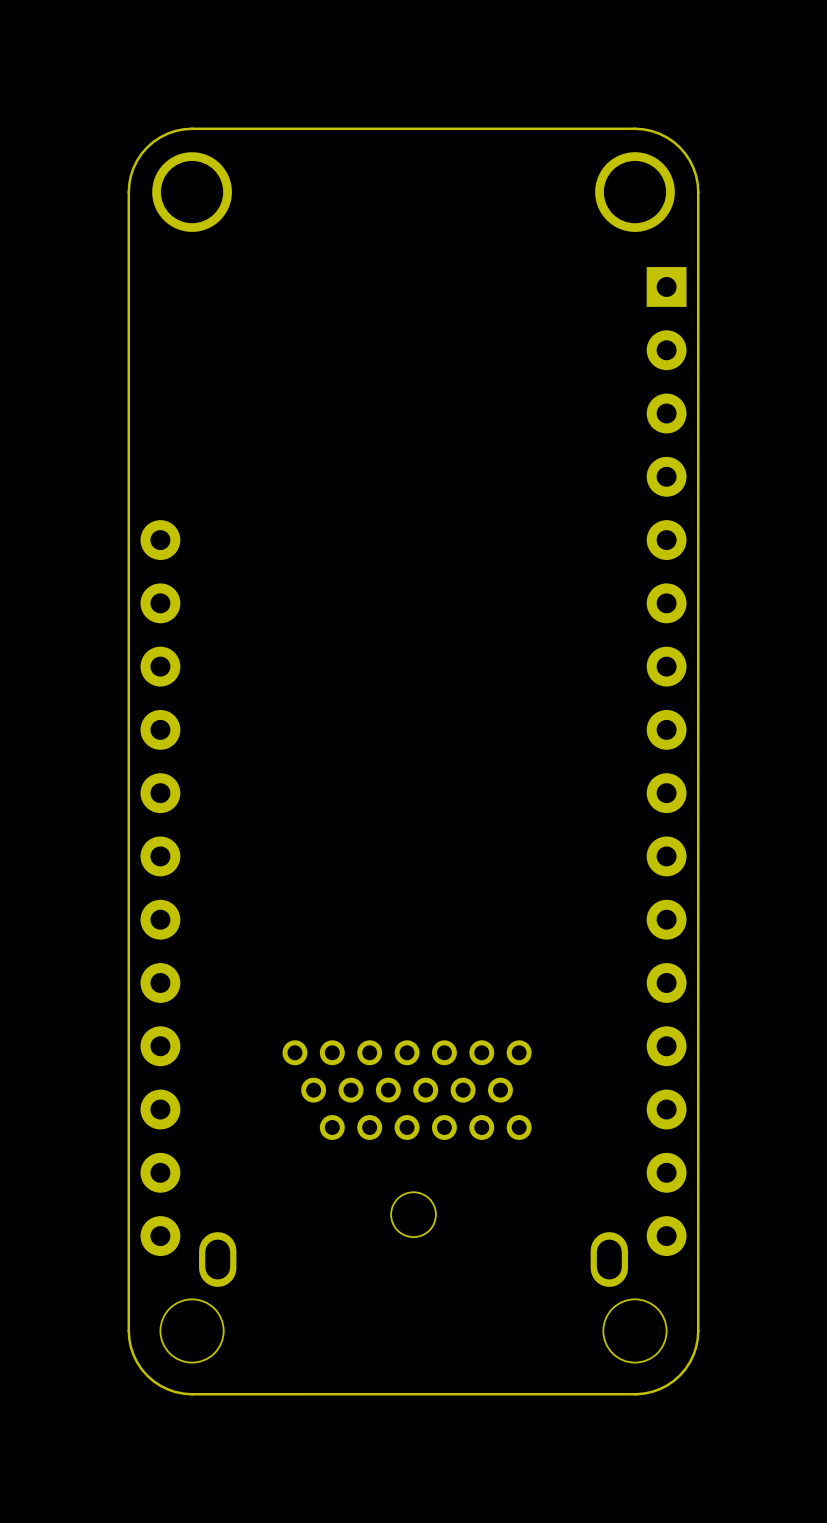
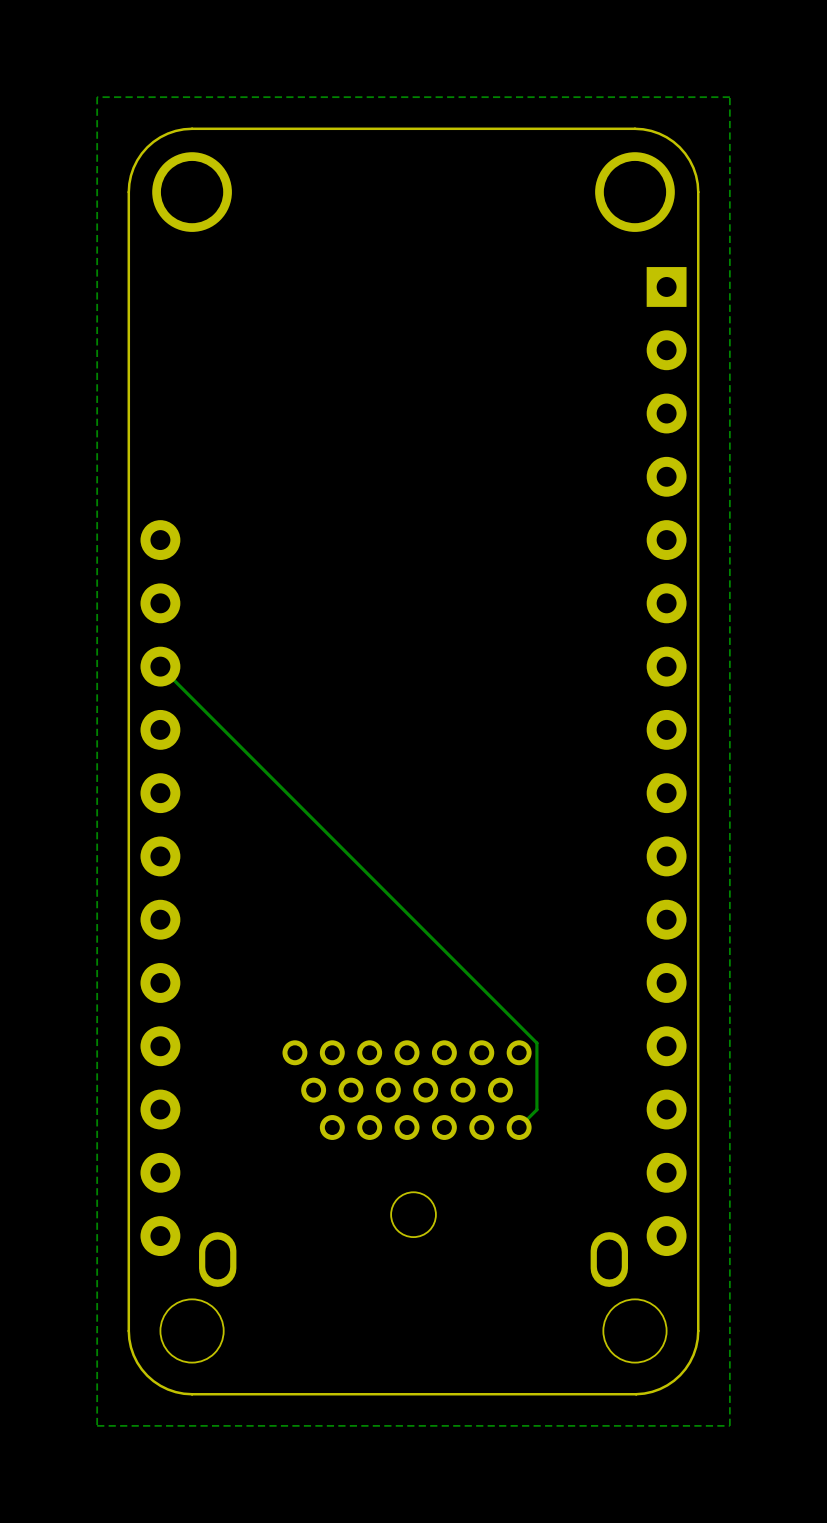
zone outline: none -> (729, 97) (729, 1425) (97, 1425) (97, 97) (729, 97)
track: none -> (160, 666) (536, 1043) (536, 1109) (519, 1127)

